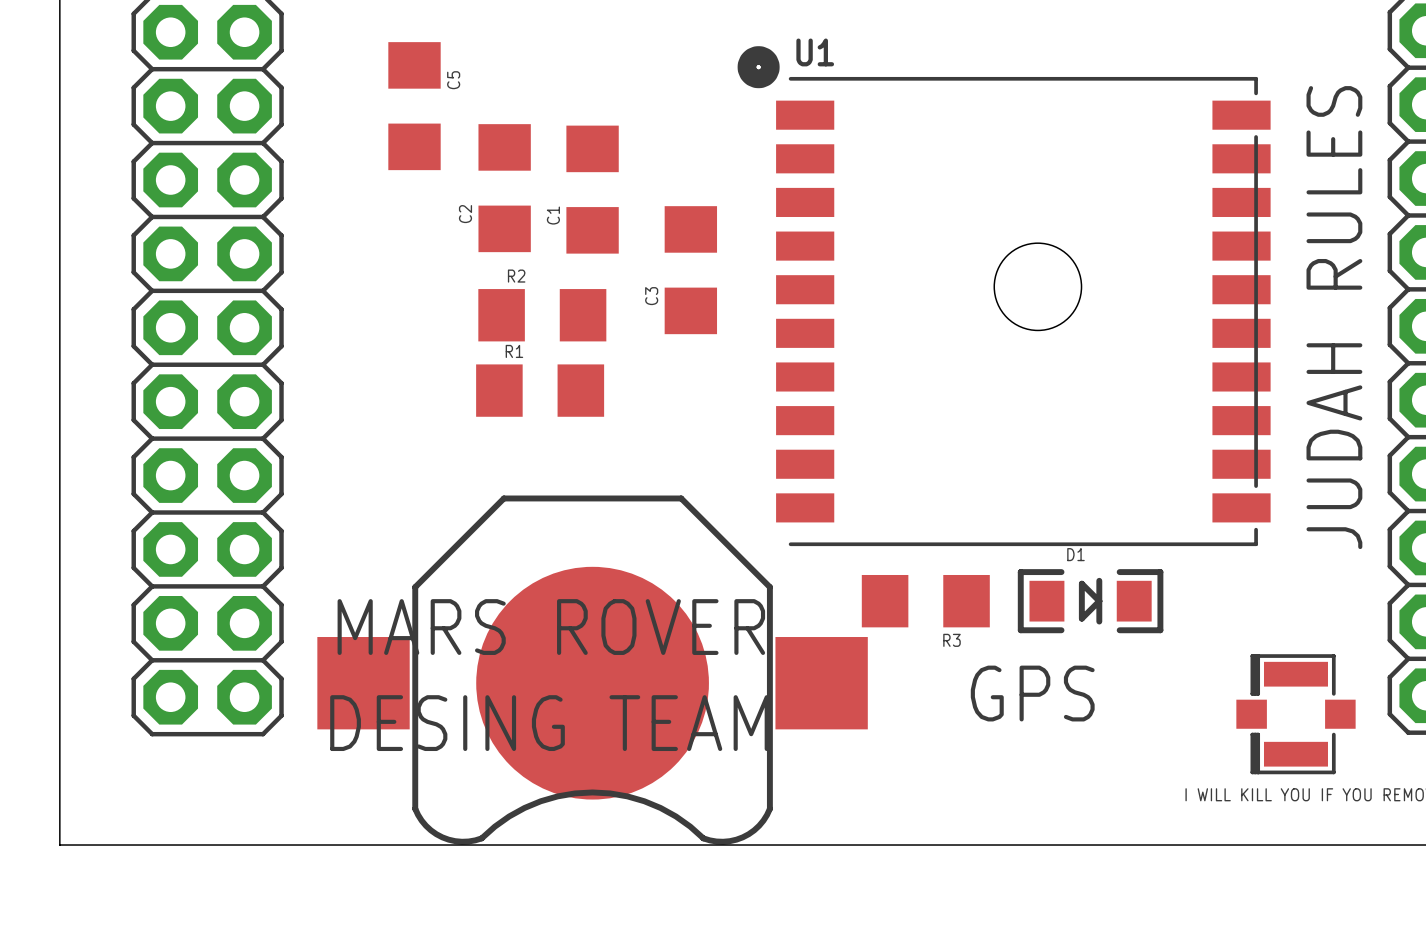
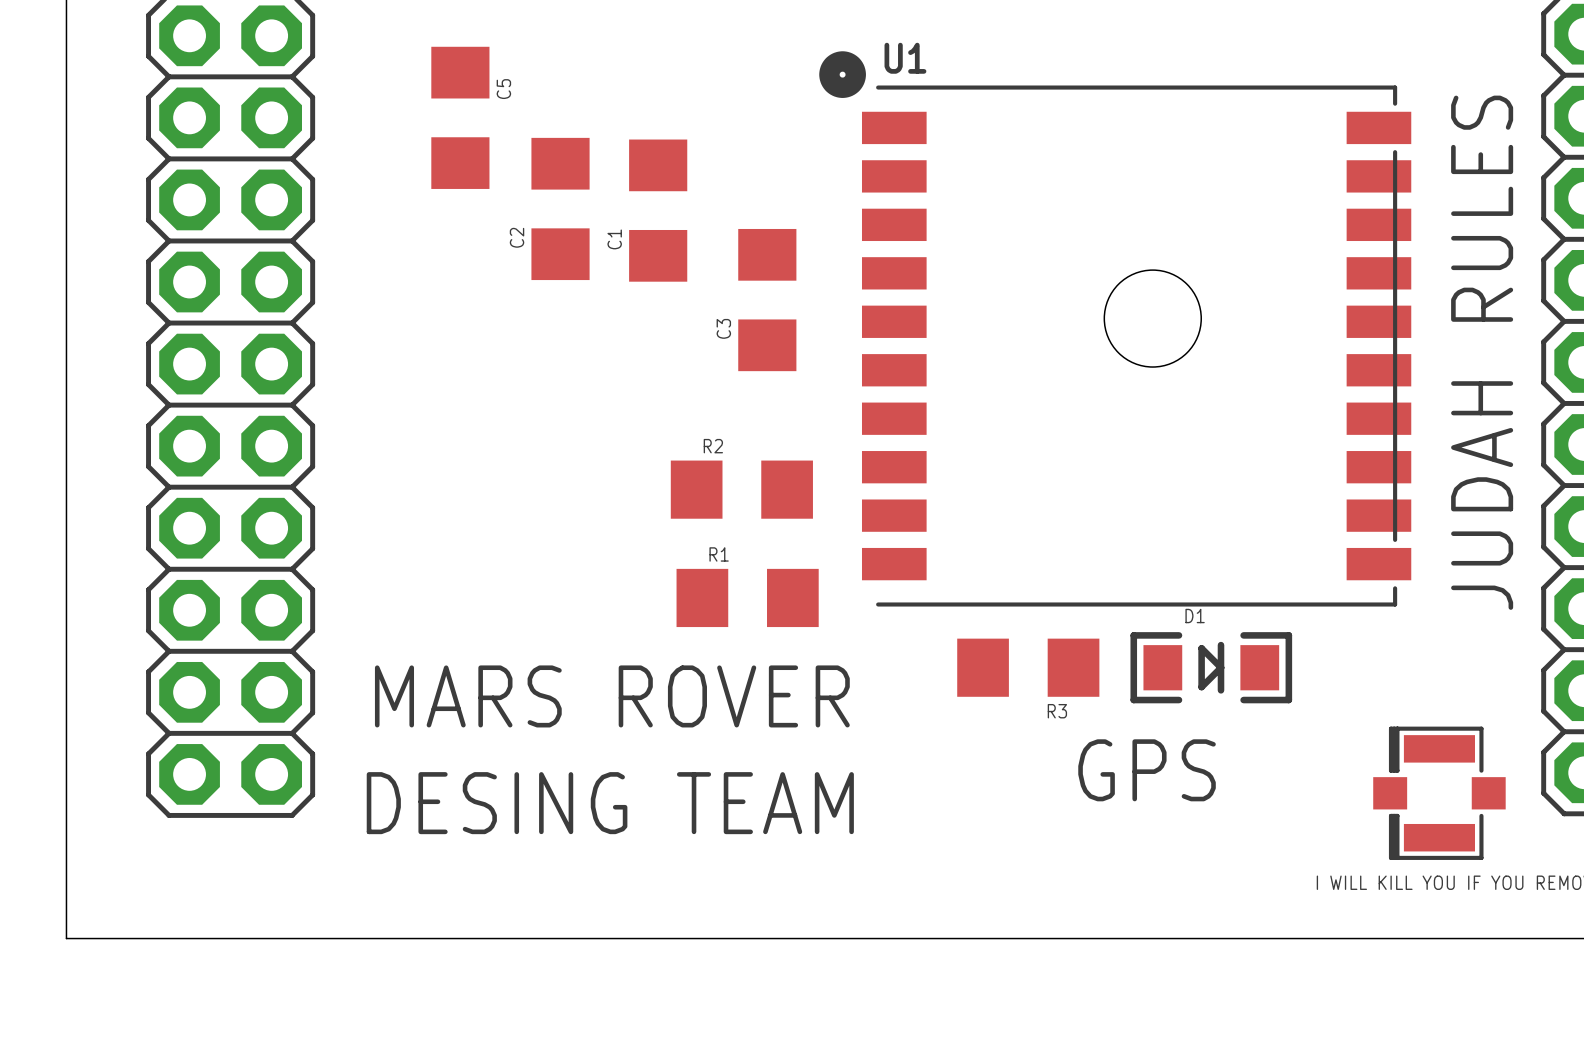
R2 position: (542, 315) -> (741, 489)
R1 position: (540, 390) -> (747, 597)
part: (592, 670) -> none

